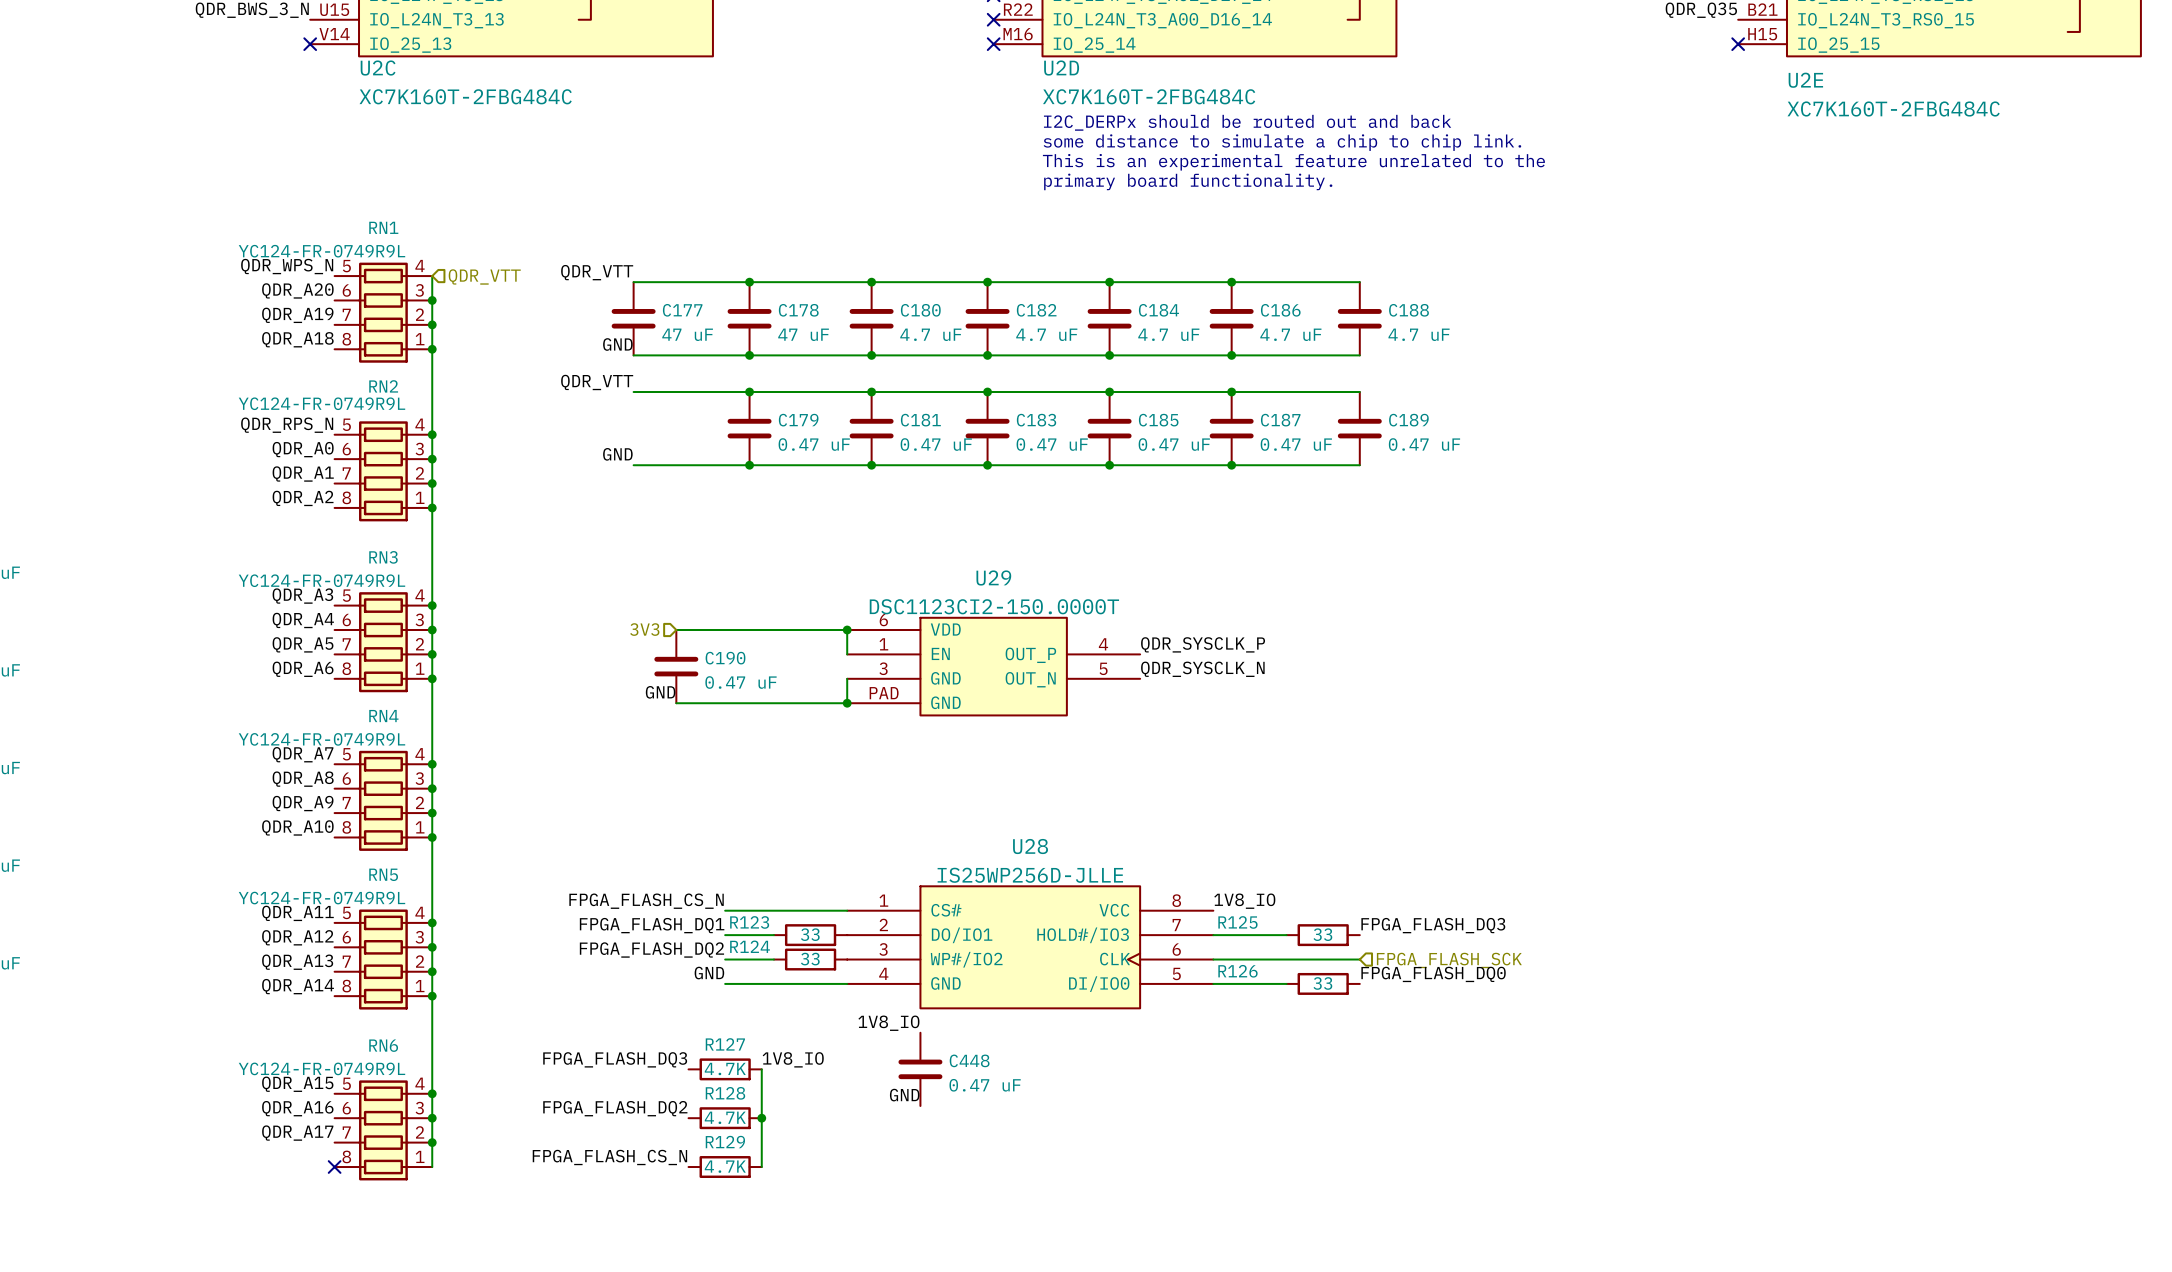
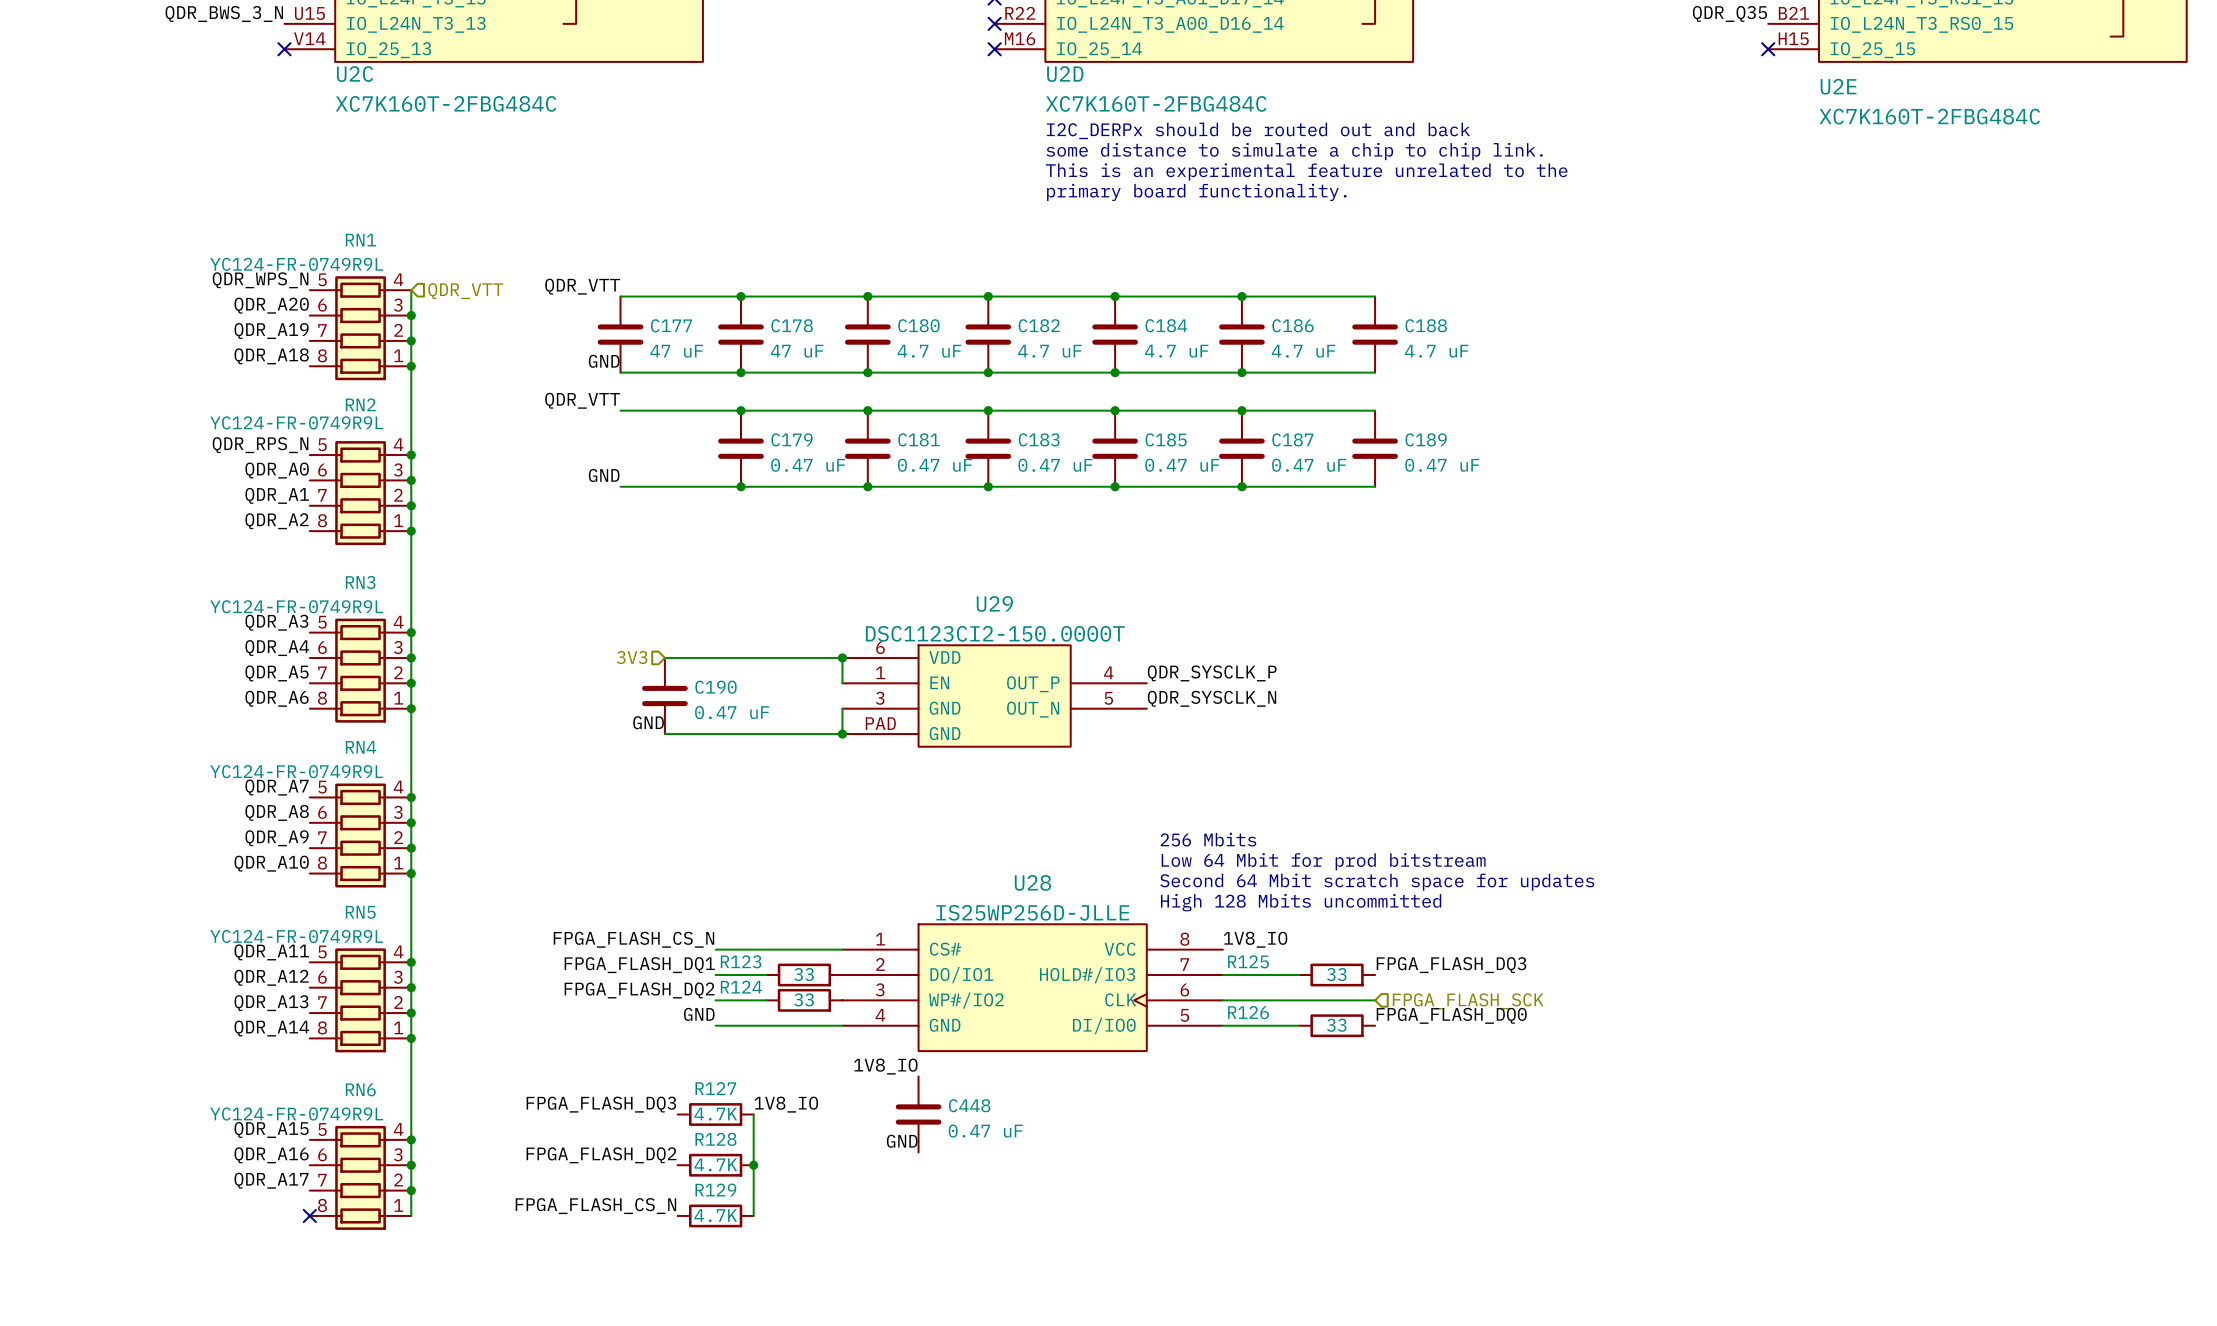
text: none -> 256 Mbits (1208, 839)
text: none -> Low 64 Mbit for prod bitstream (1323, 861)
text: none -> Second 64 Mbit scratch space for updates (1377, 882)
text: none -> High 128 Mbits uncommitted (1301, 902)

